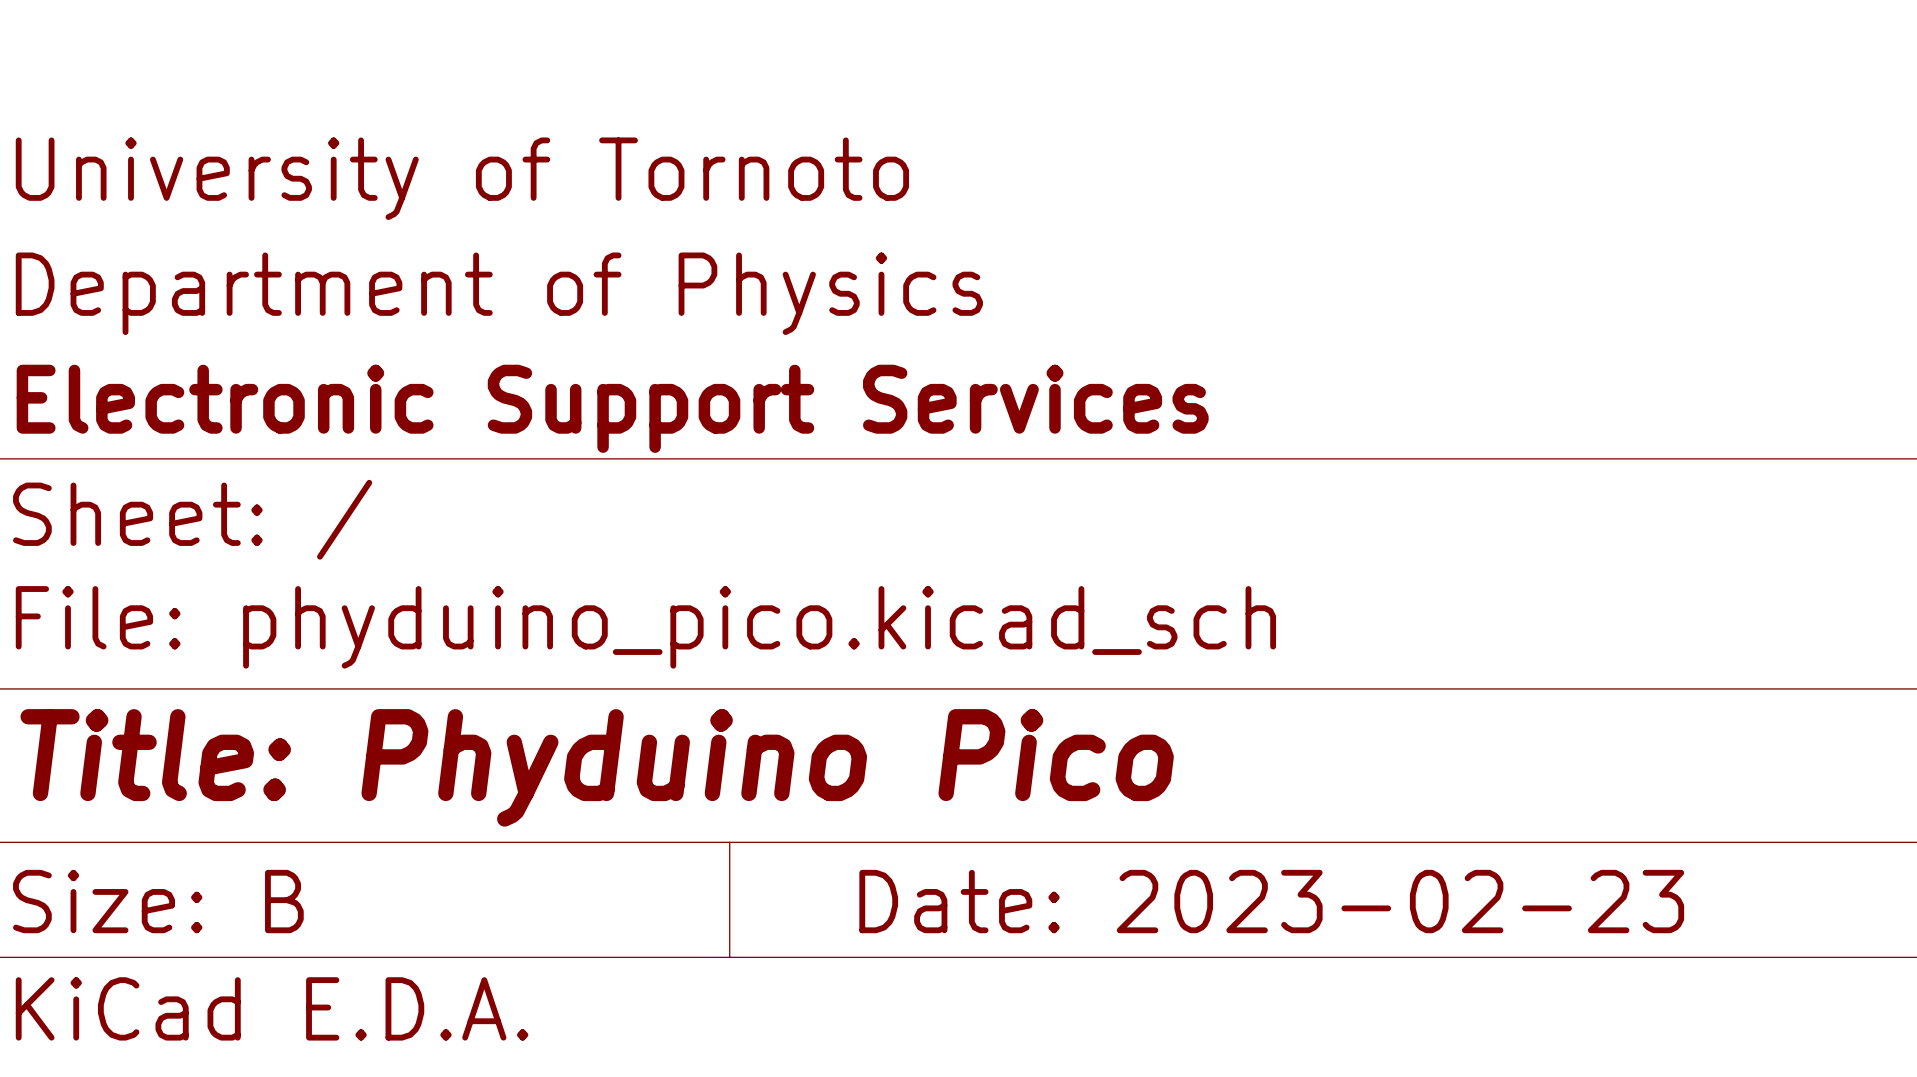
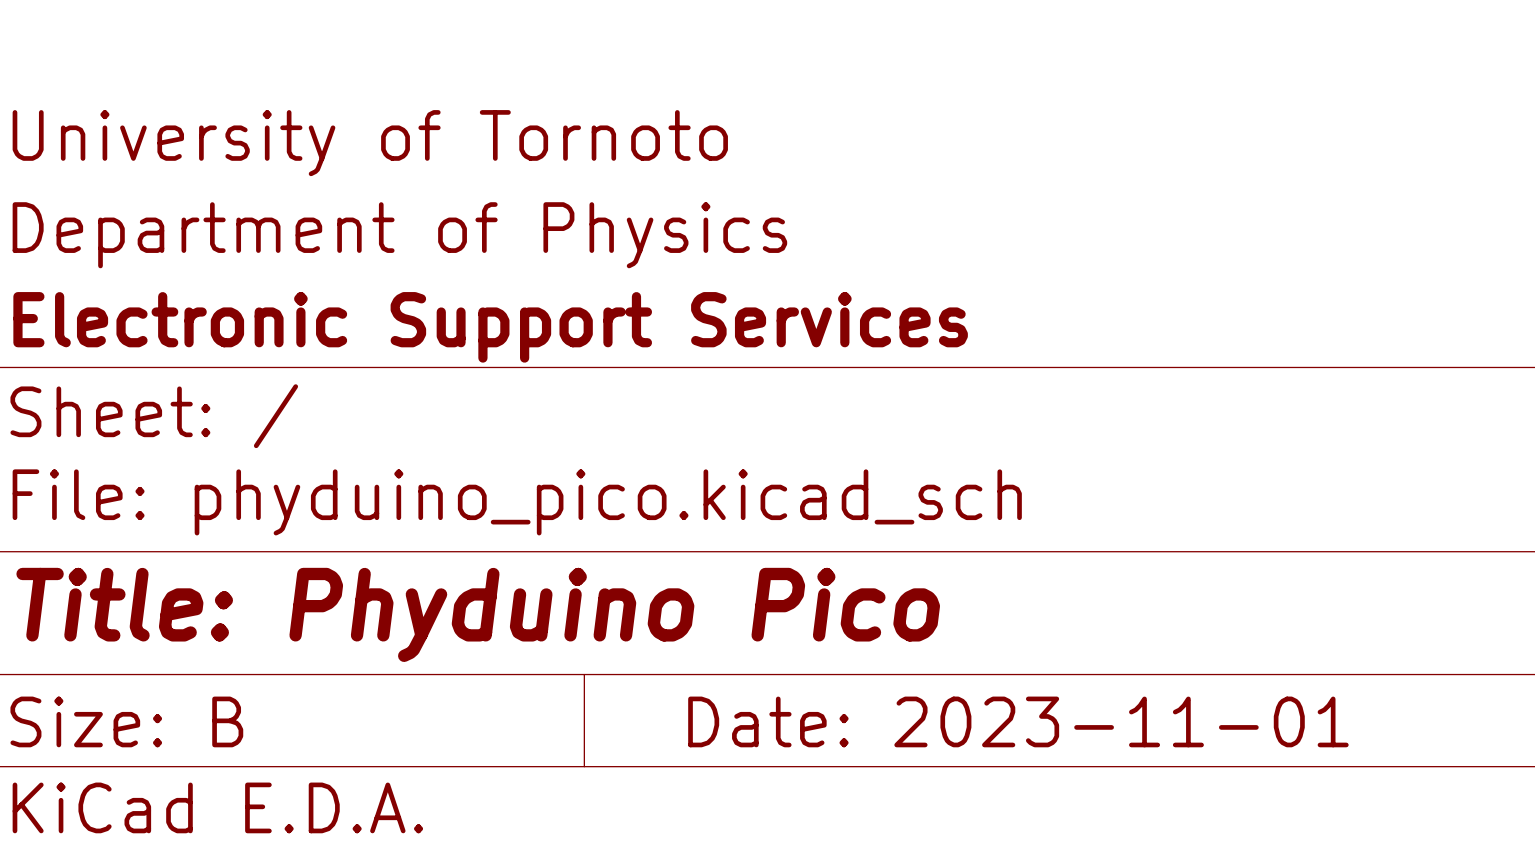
title block: Date: 2023-02-23 (1271, 901) -> Date: 2023-11-01 (1018, 721)

